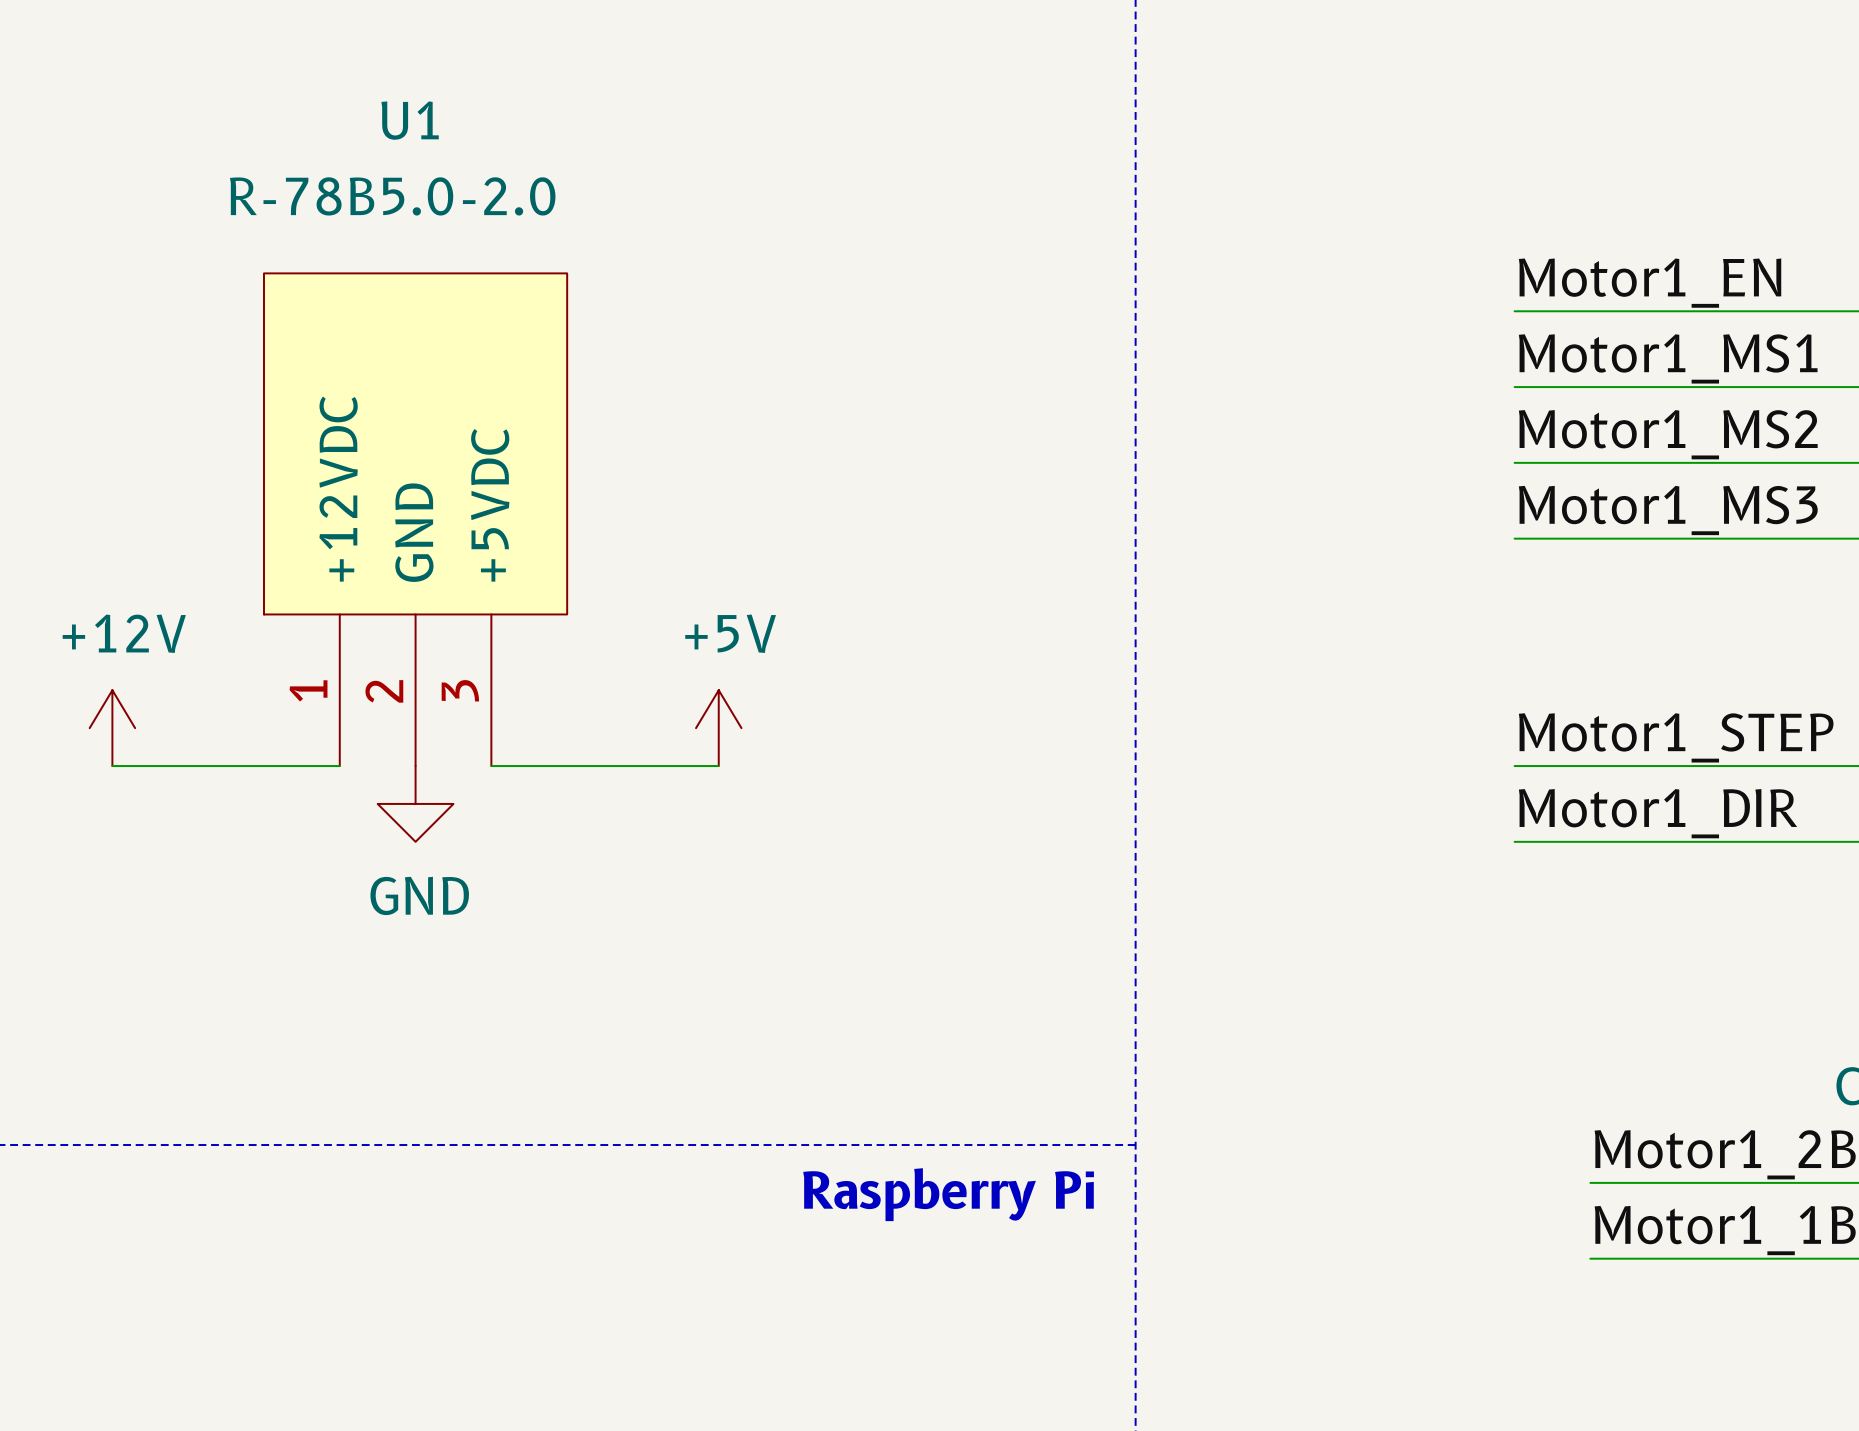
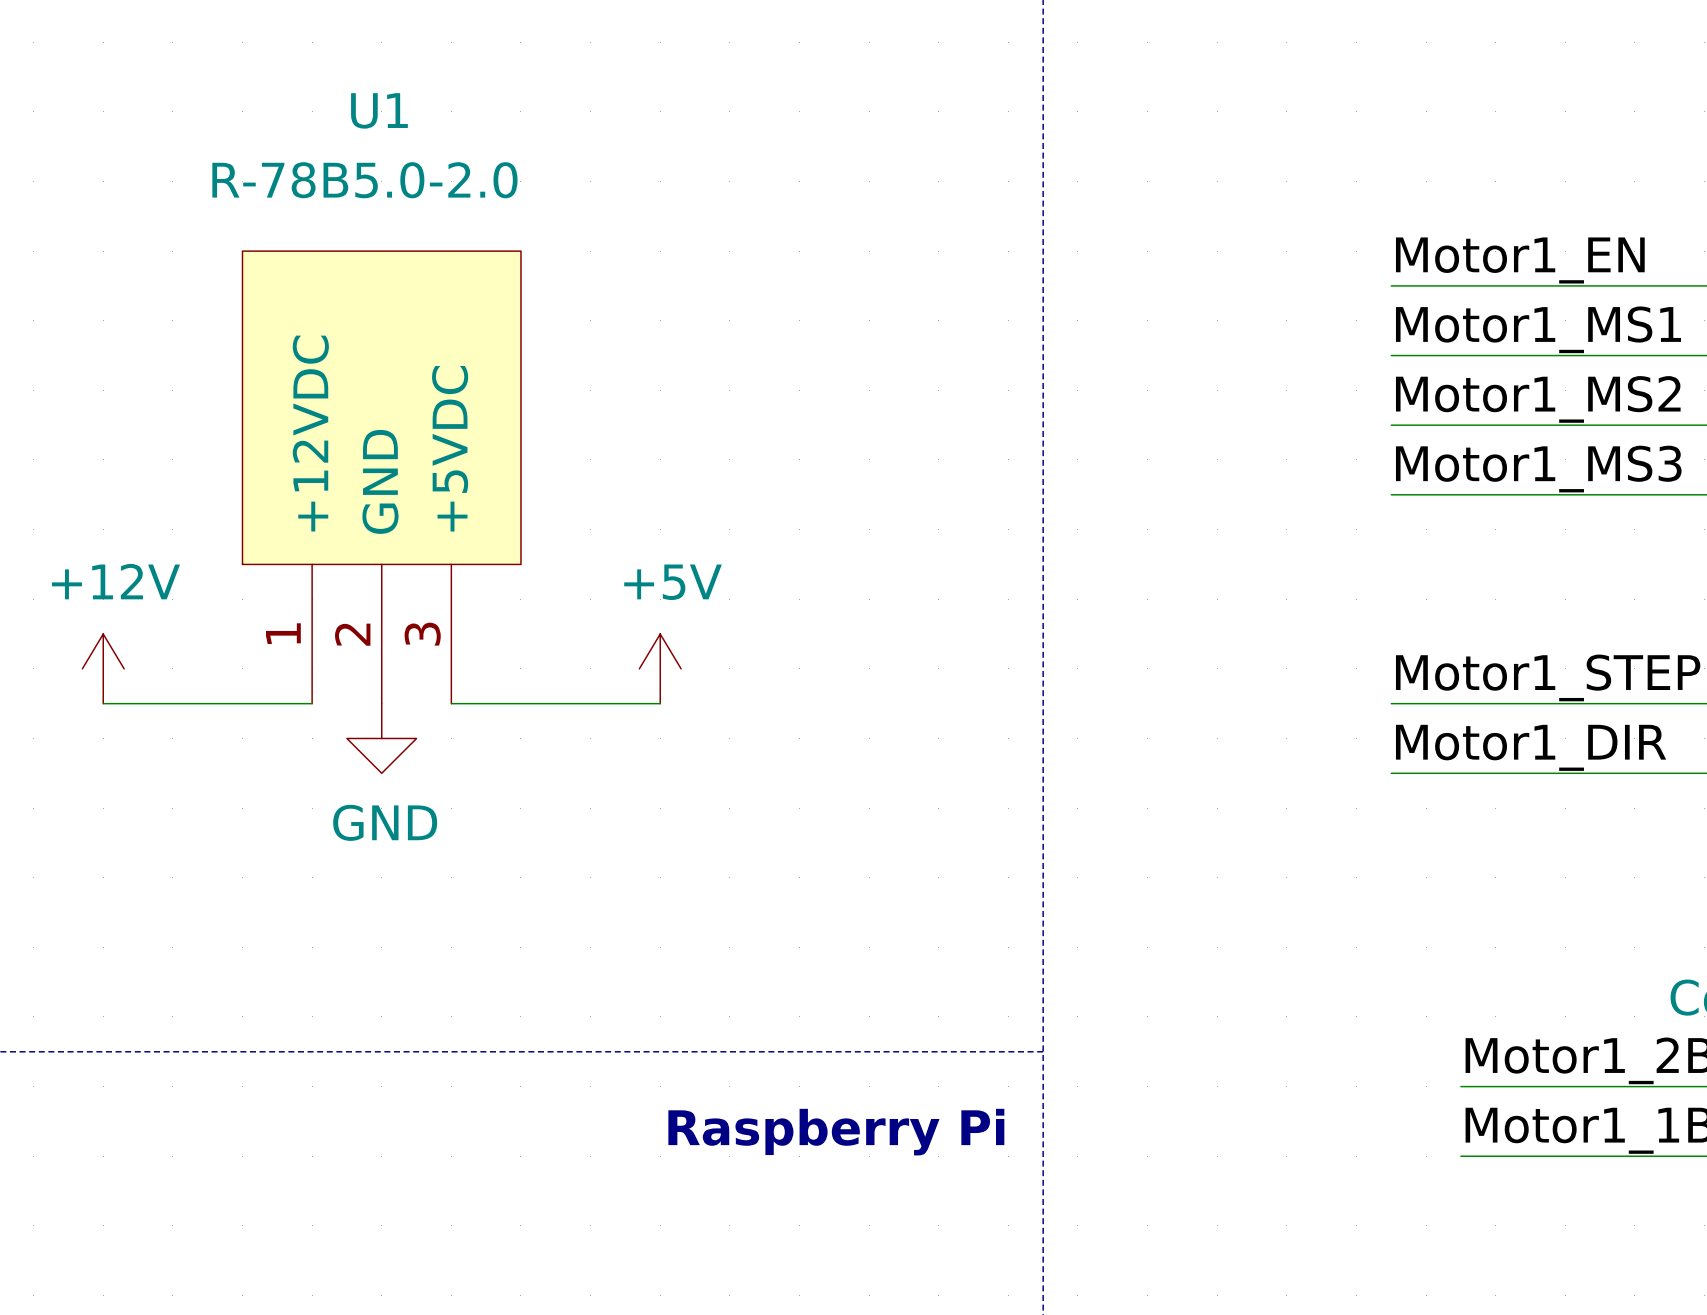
text position: Raspberry Pi (948, 1194) -> Raspberry Pi (836, 1132)

